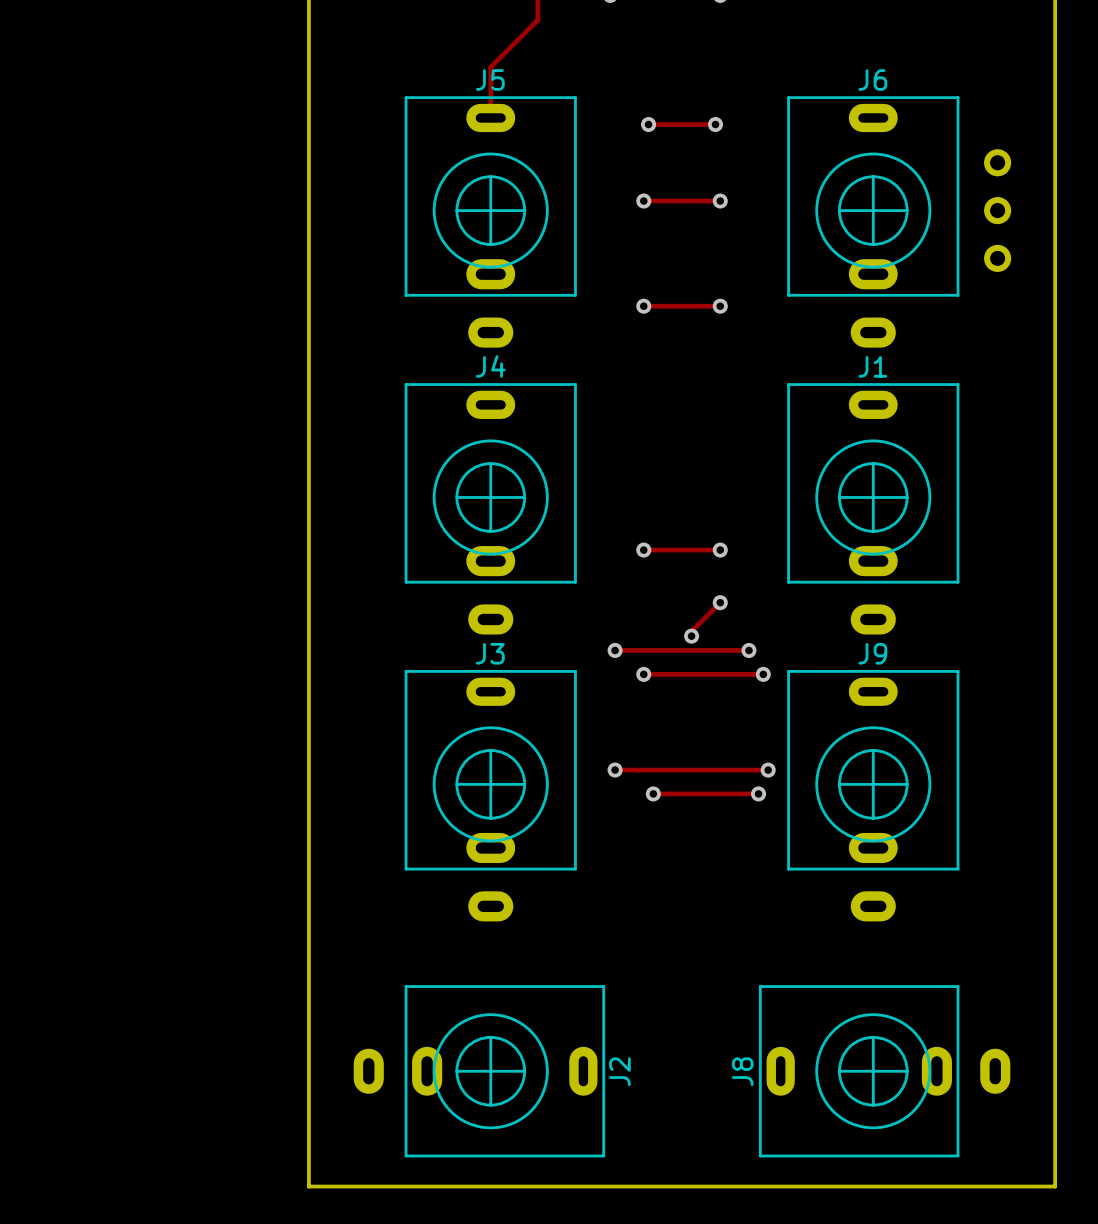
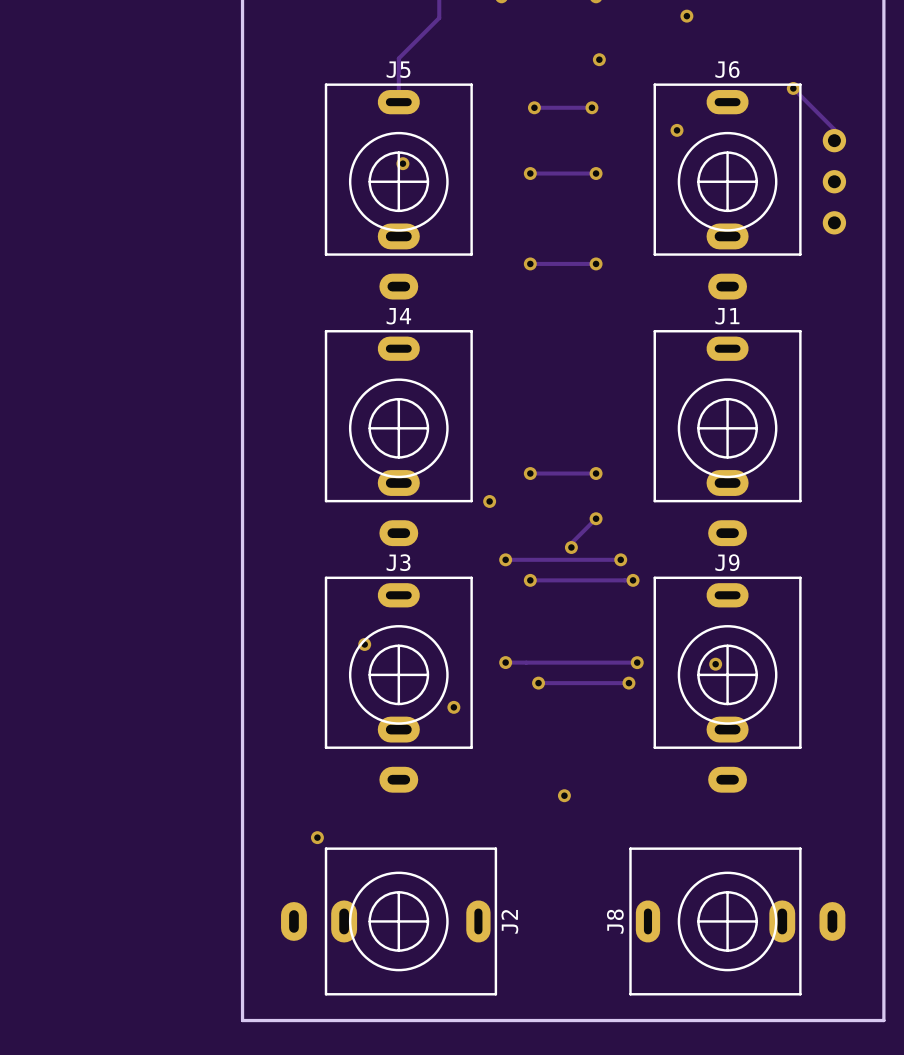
via: none -> (686, 16)
via: none -> (599, 59)
track: none -> (793, 88) (834, 129) (834, 140)
via: none -> (793, 88)
via: none -> (677, 130)
via: none -> (402, 163)
via: none -> (489, 501)
via: none -> (364, 644)
via: none -> (715, 664)
via: none -> (453, 707)
via: none -> (564, 795)
via: none -> (317, 837)

